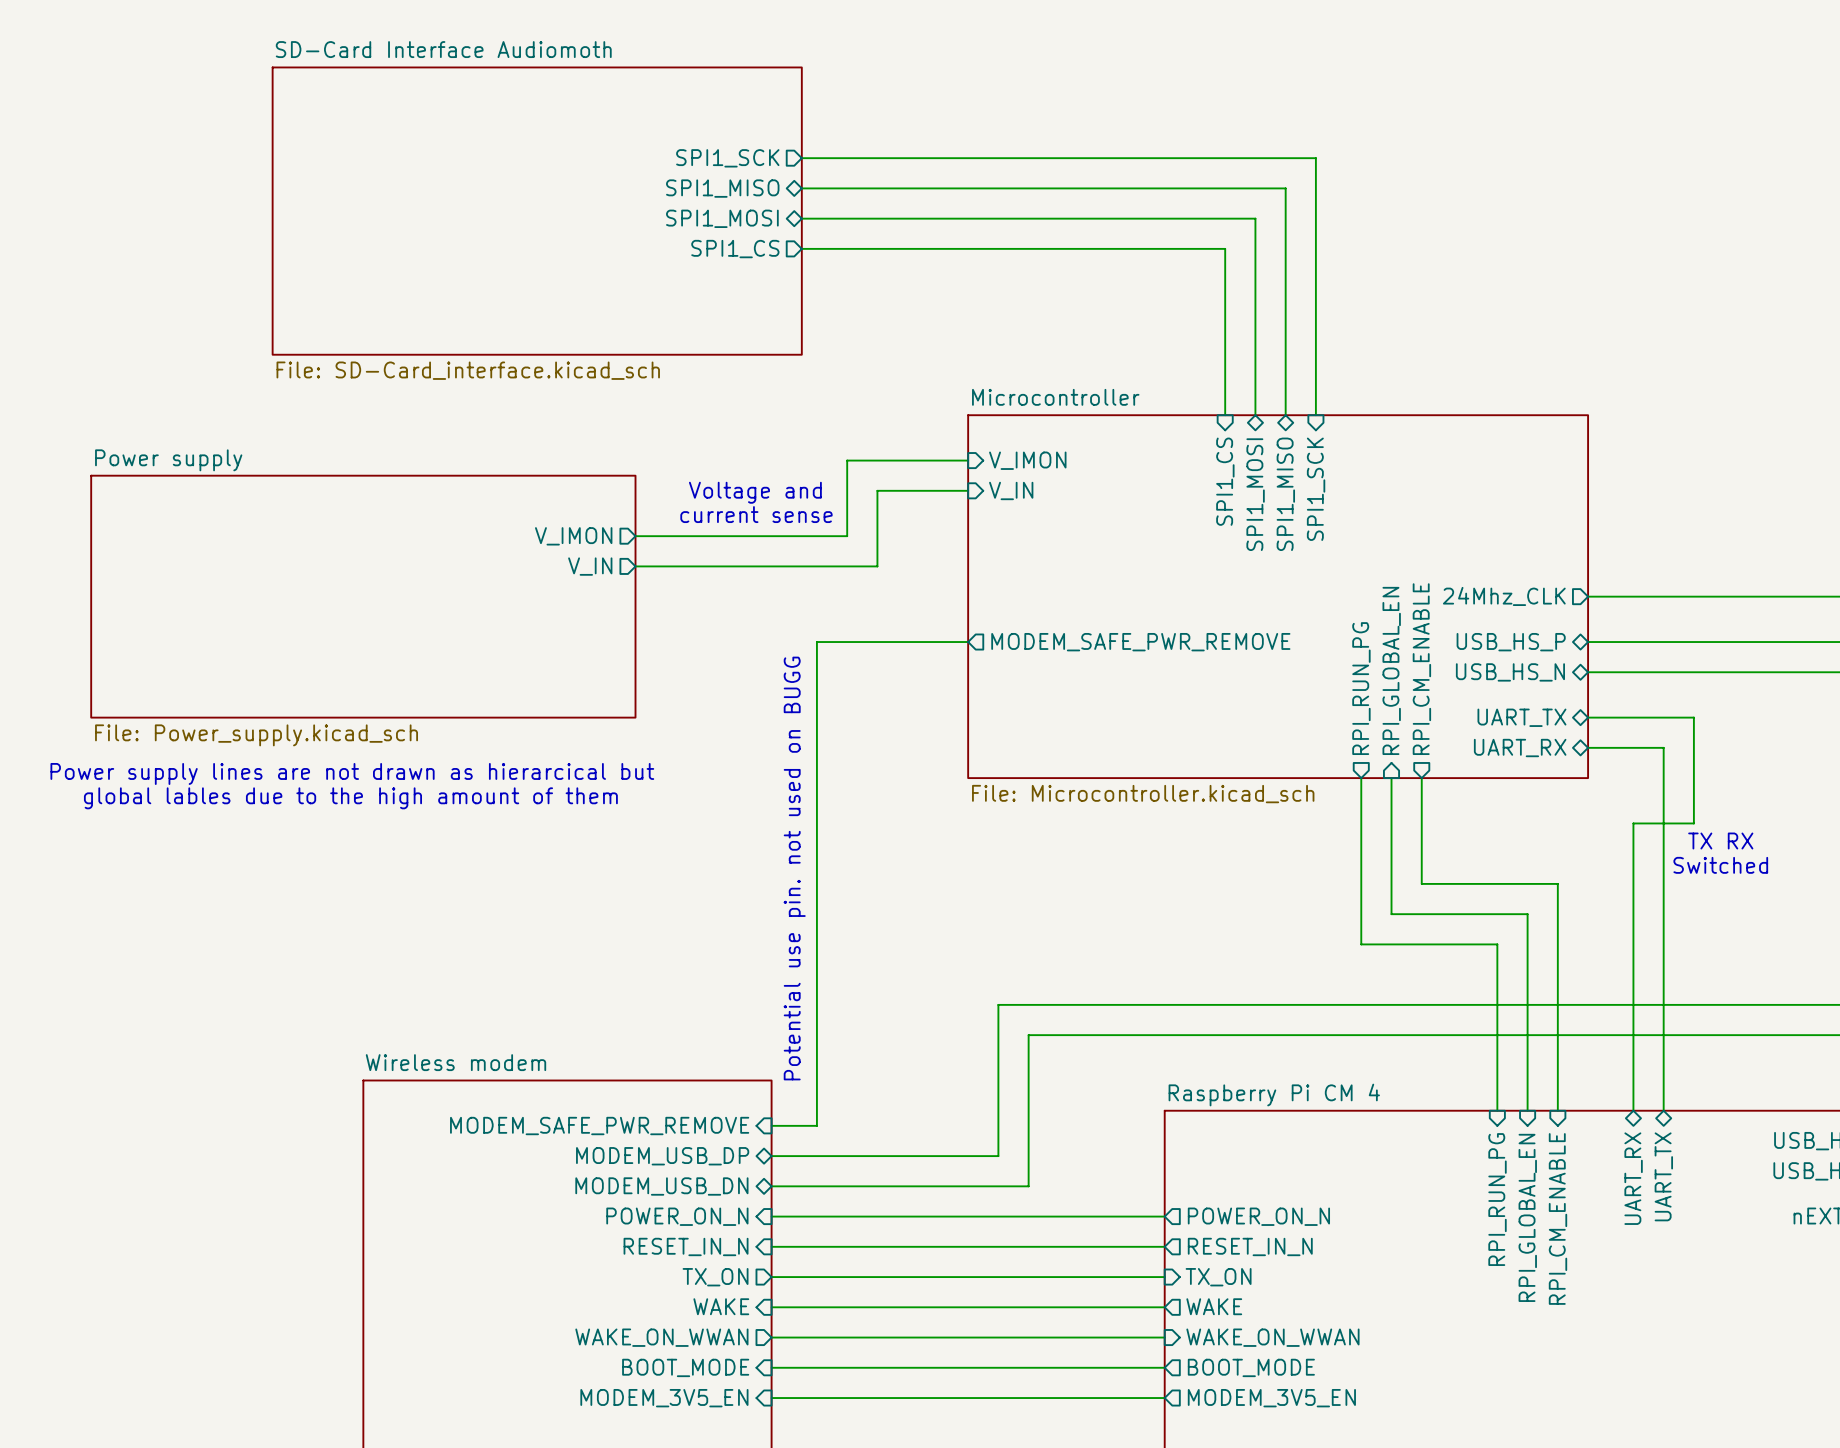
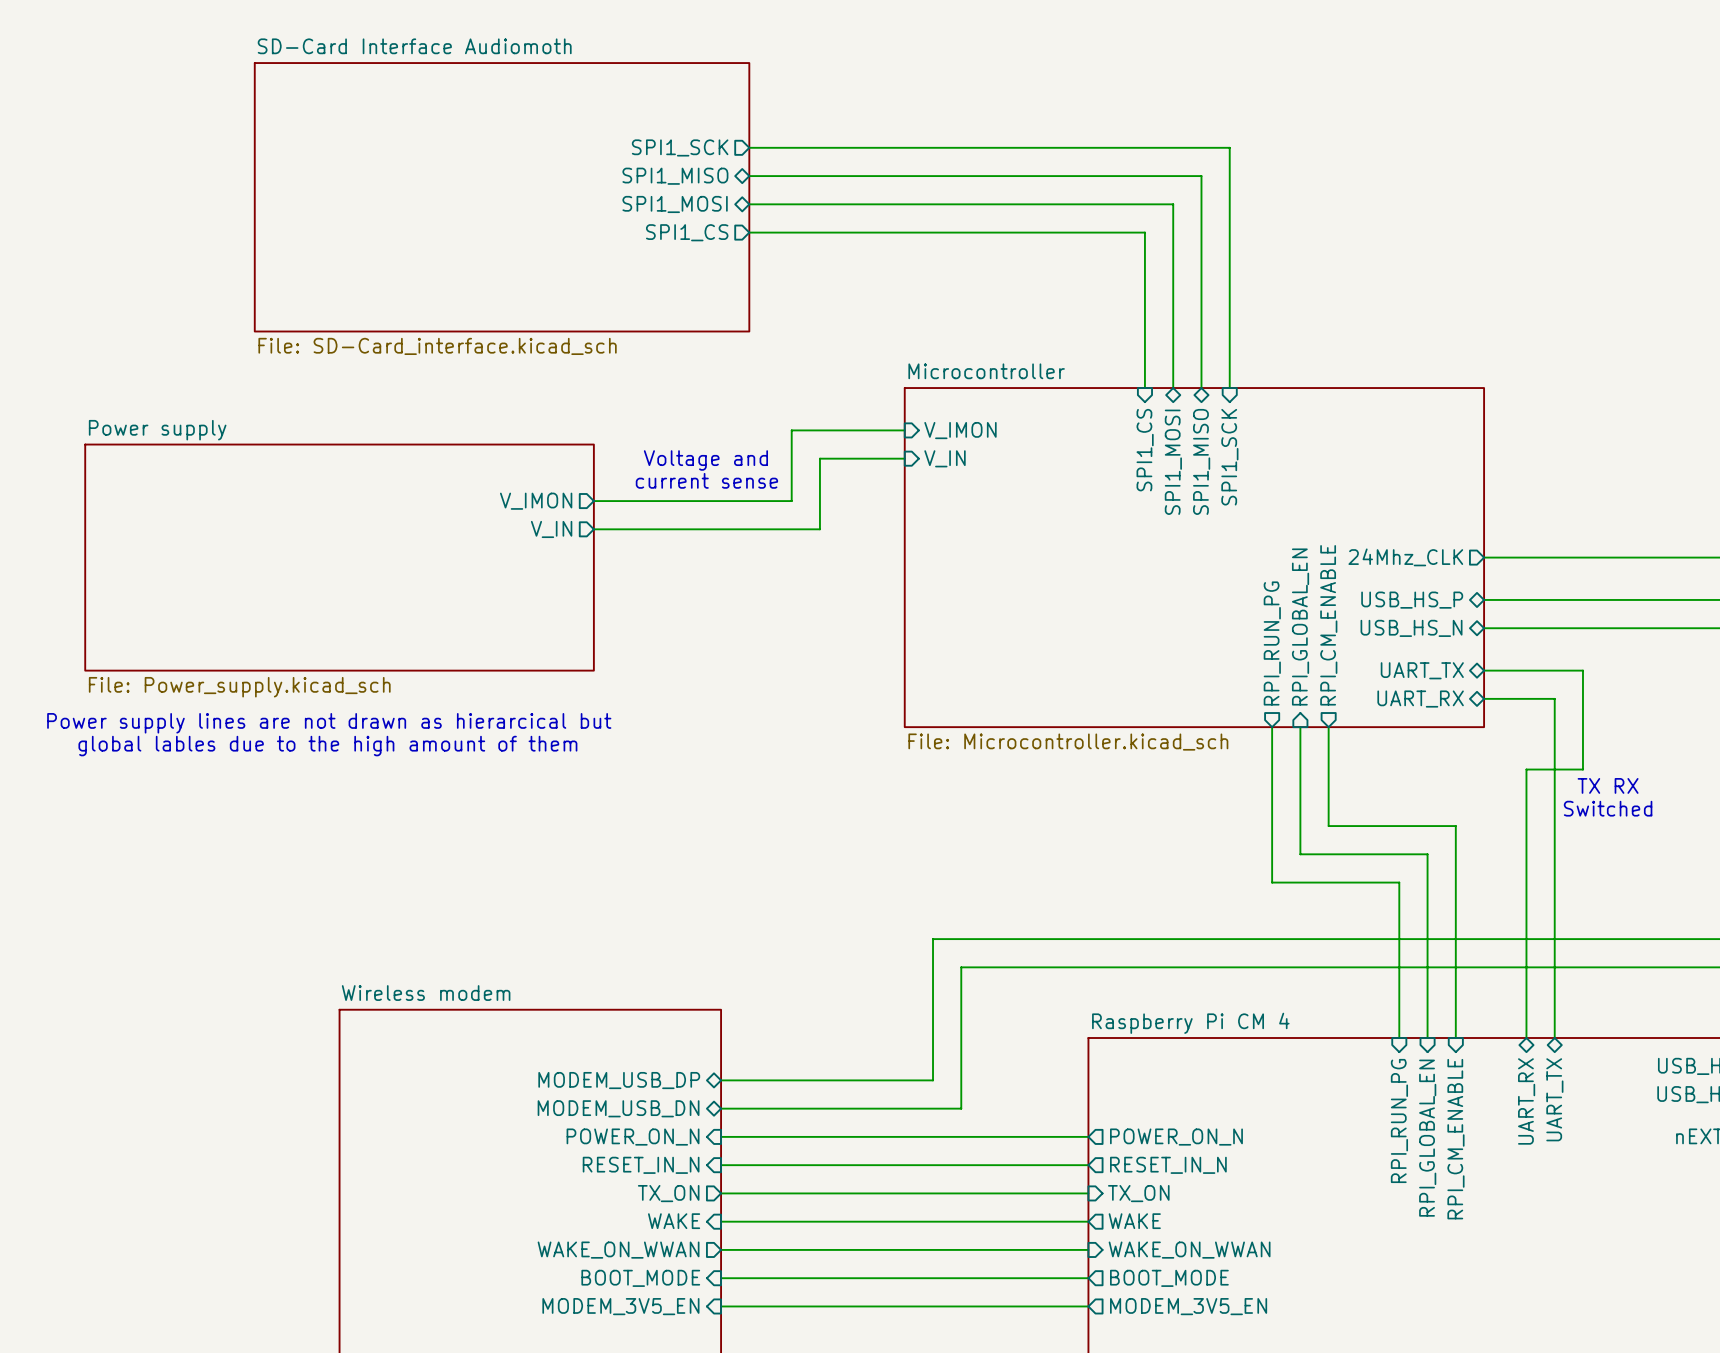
wire: (968, 642) (816, 642) (816, 1125) (771, 1125) -> none
sheet pin: MODEM_SAFE_PWR_REMOVE (1140, 642) -> none
text: Potential use pin. not used on BUGG (794, 868) -> none
sheet pin: MODEM_SAFE_PWR_REMOVE (599, 1126) -> none

